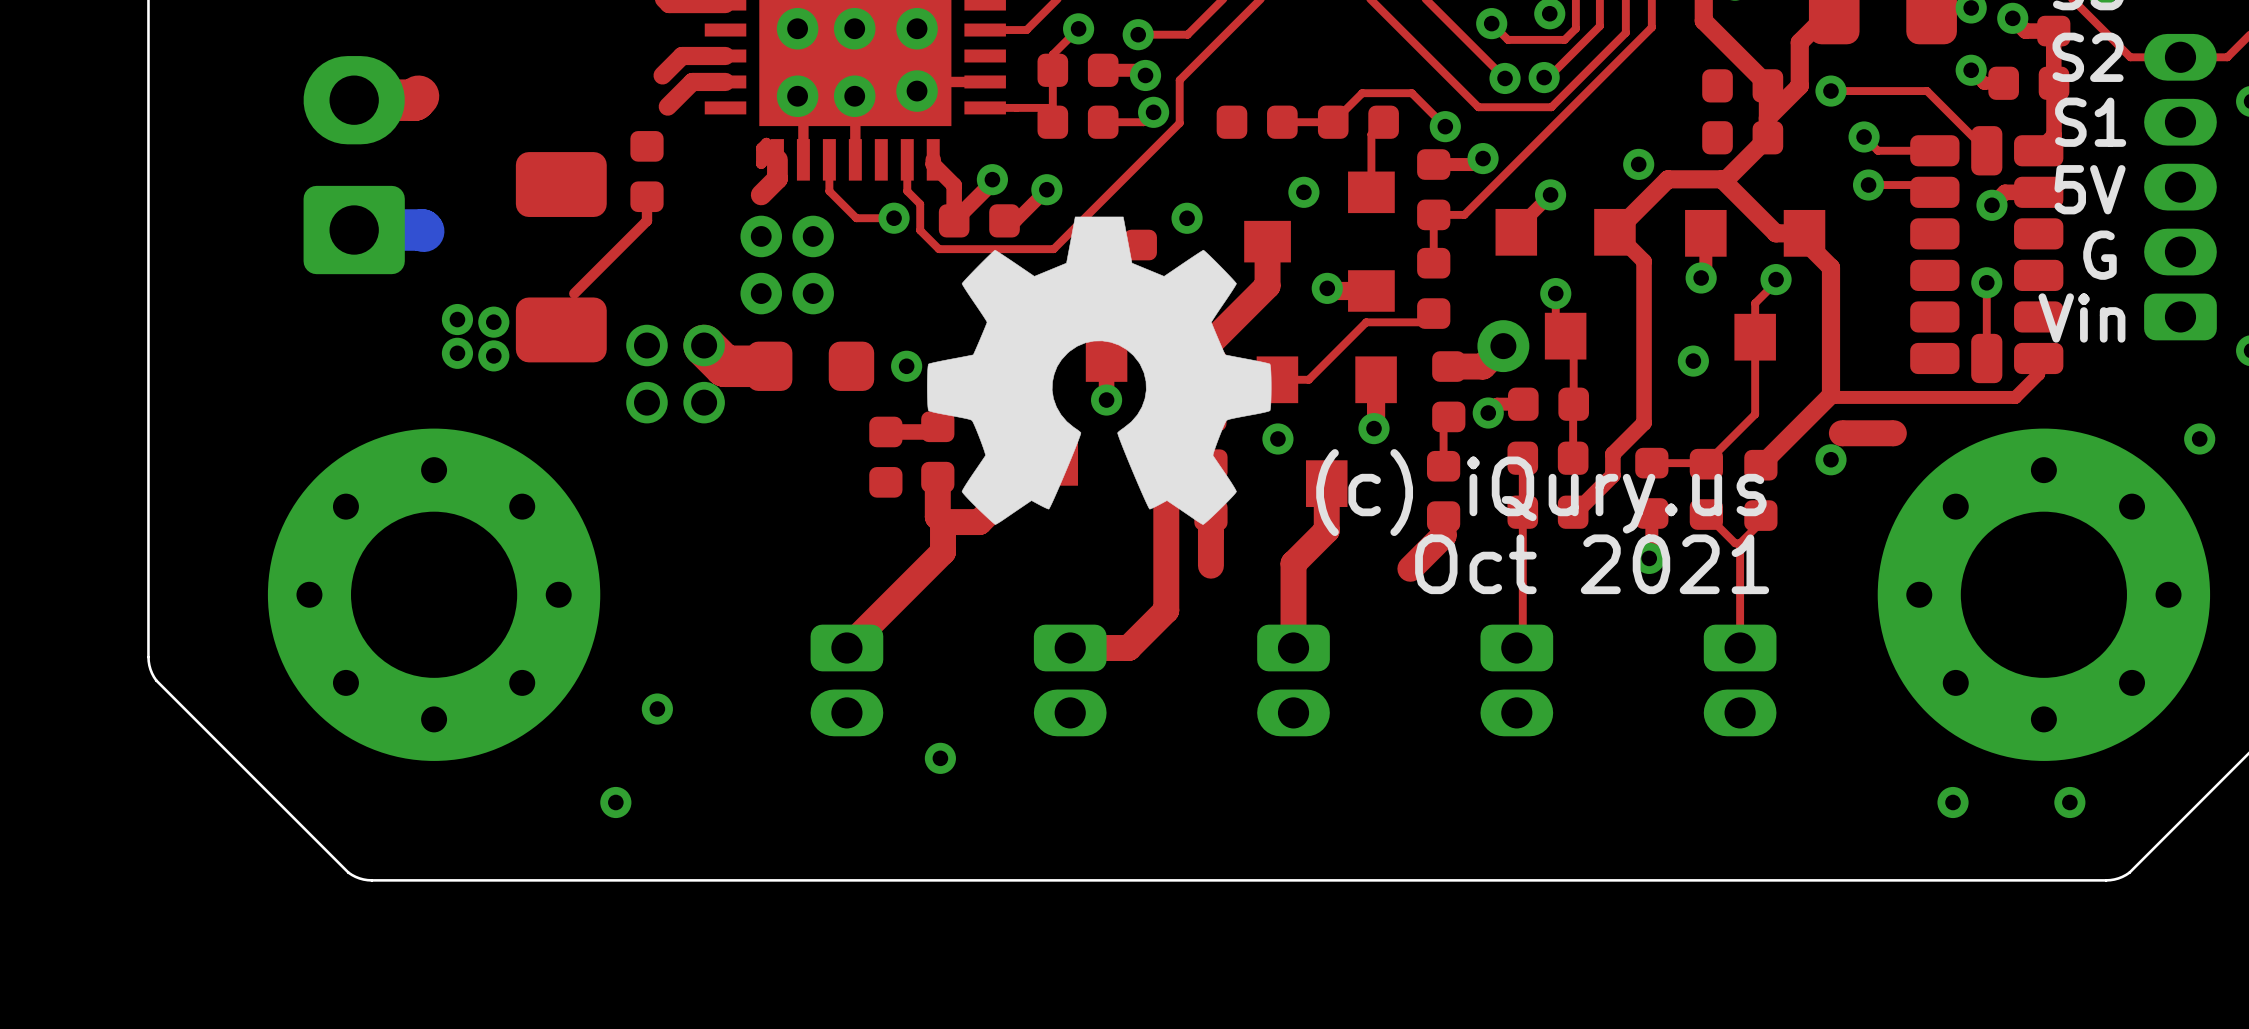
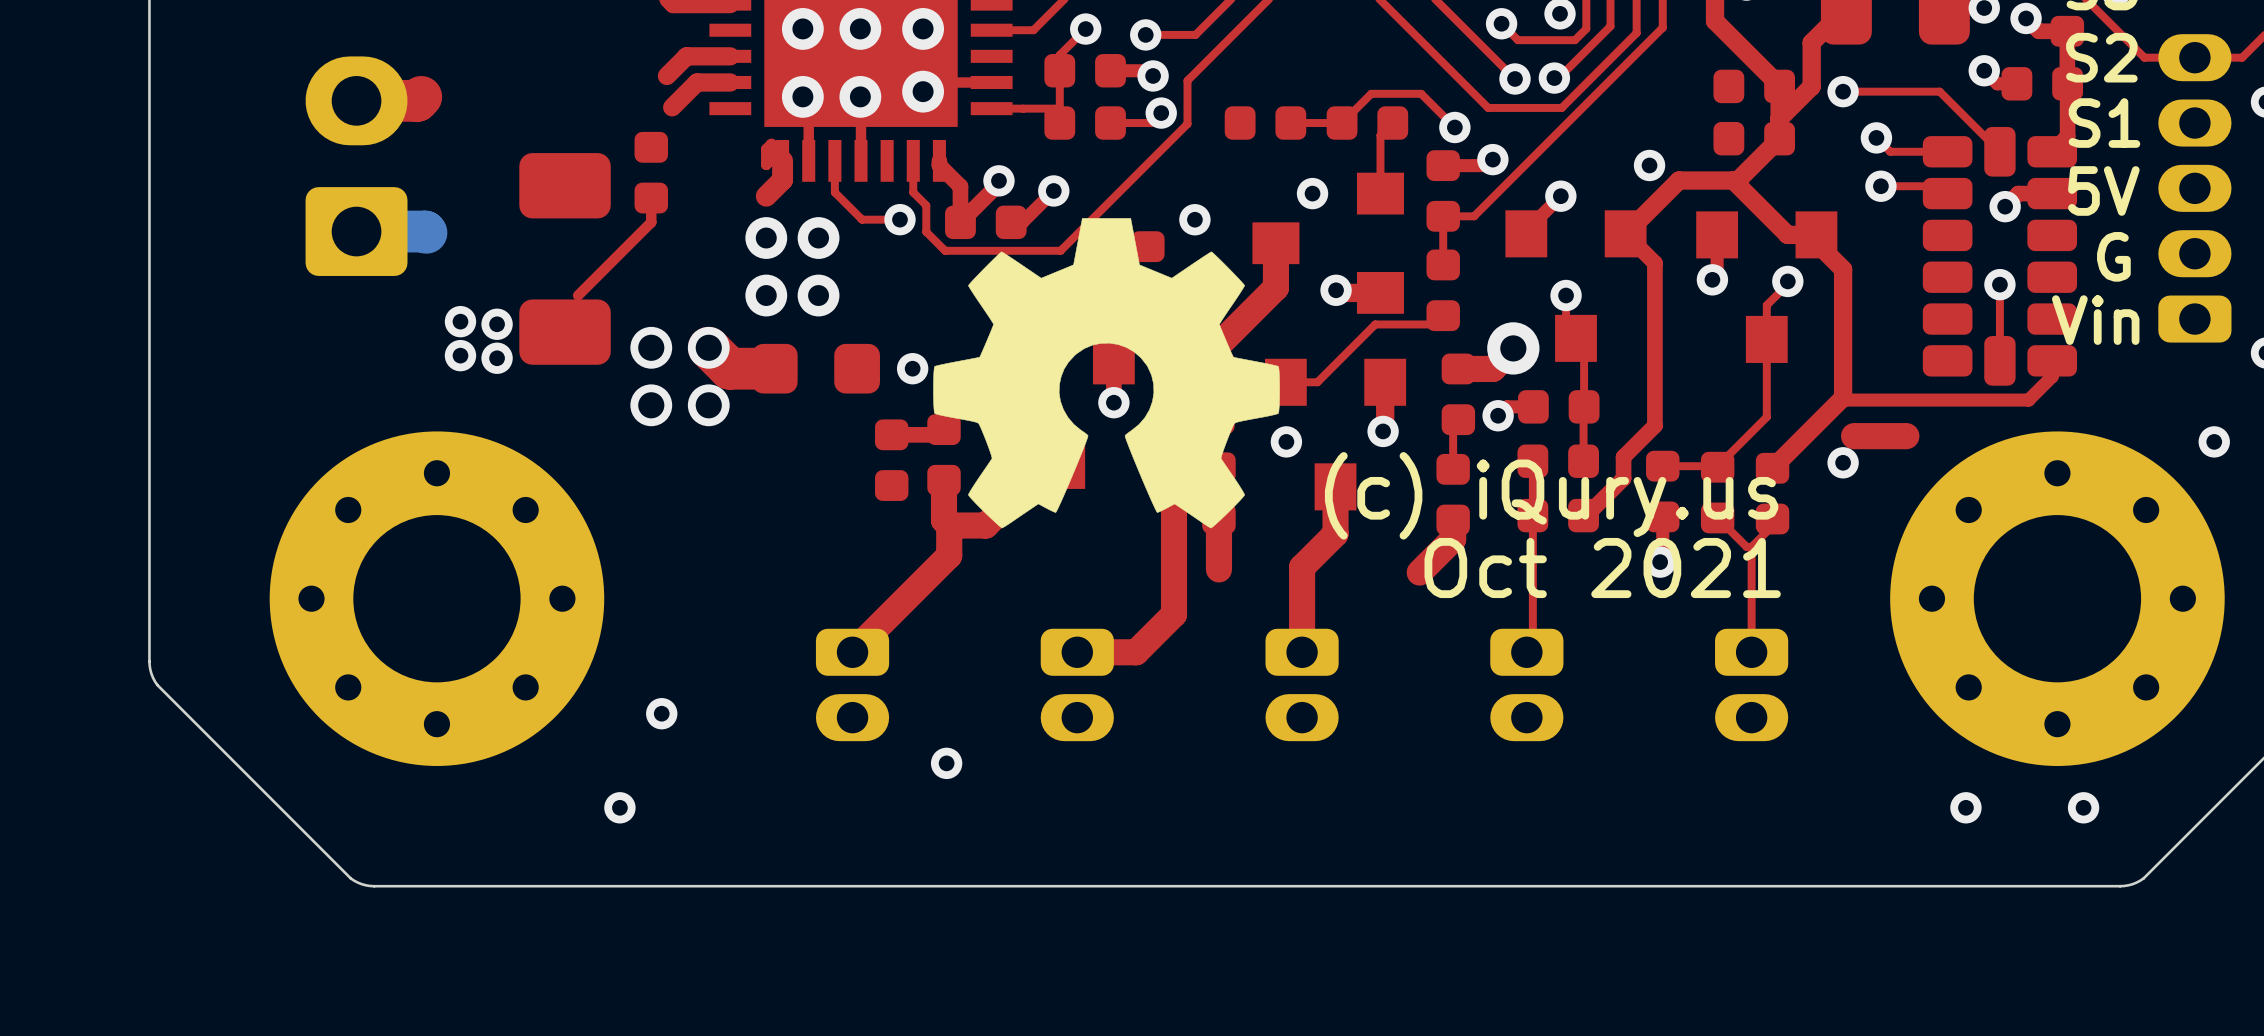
via: (1693, 361) -> none

